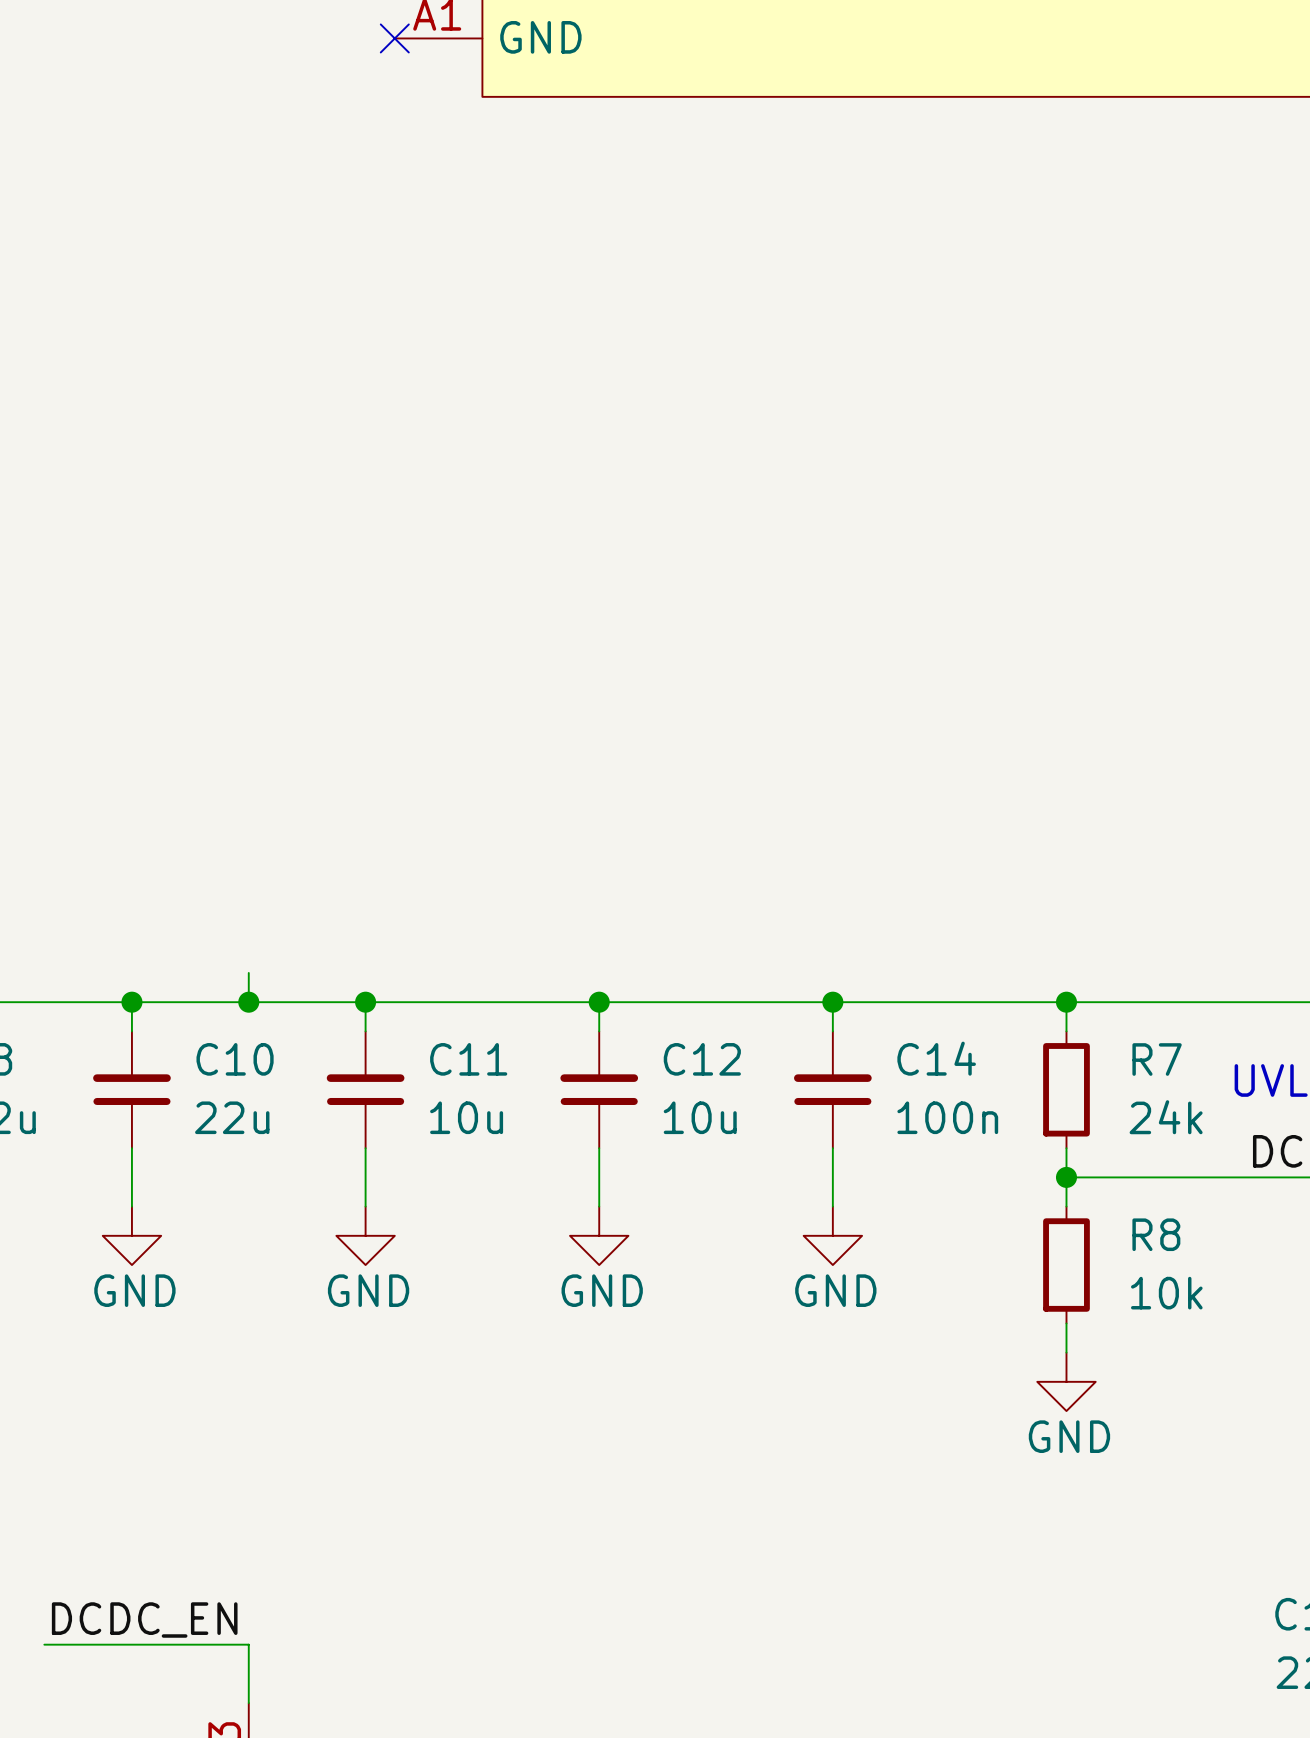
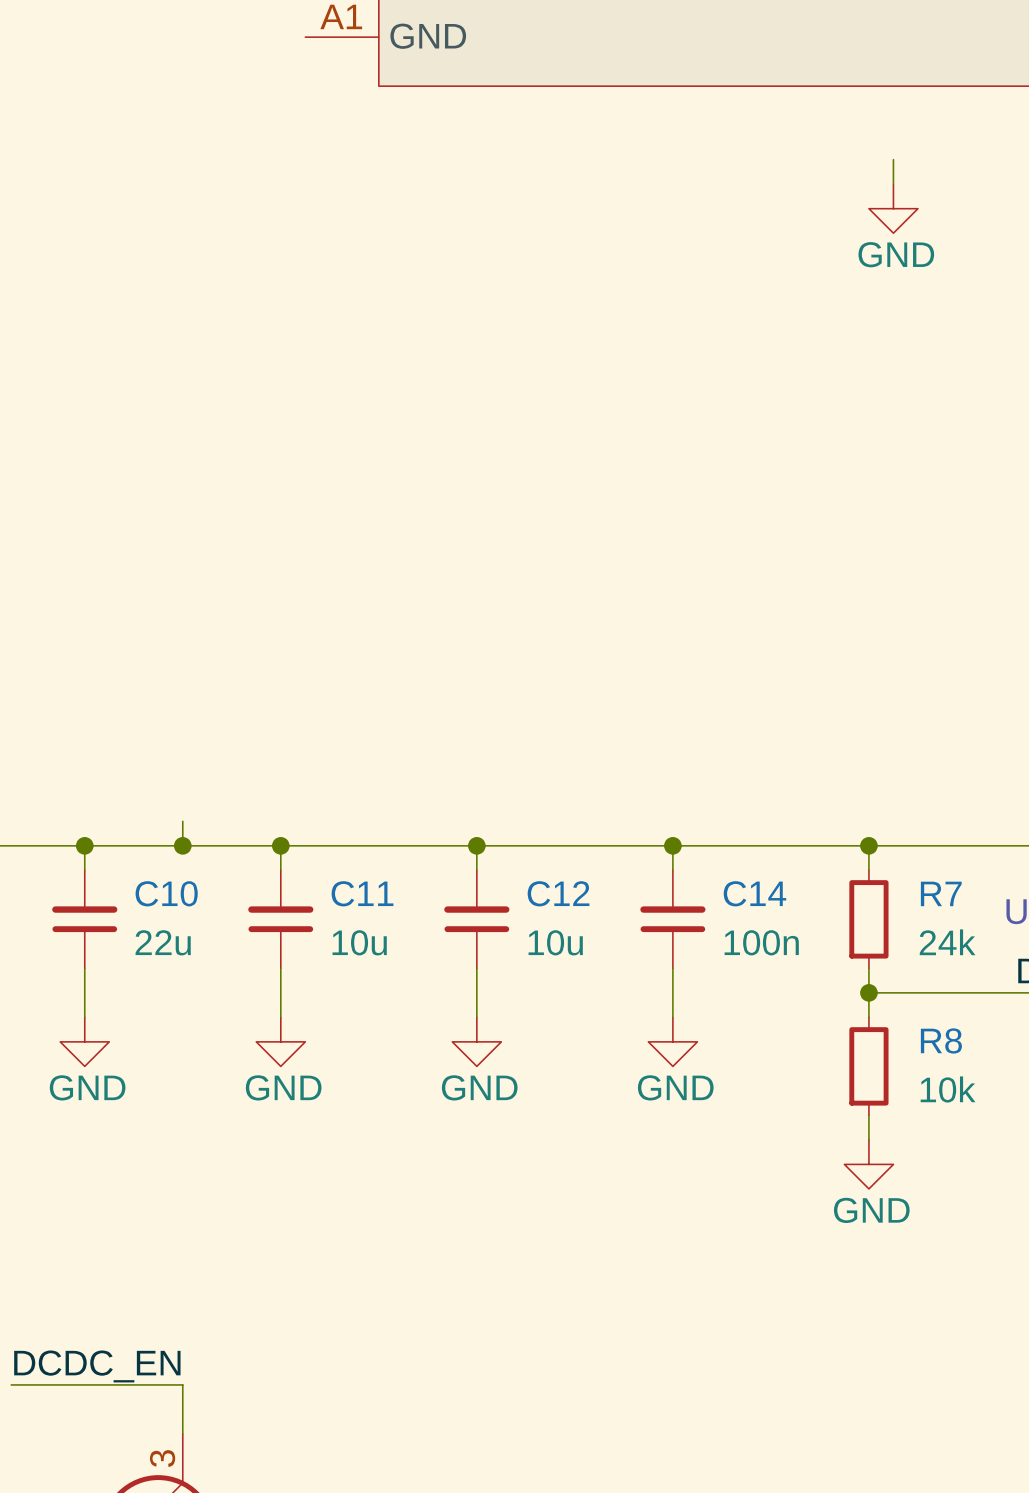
no-connect mark: (394, 38) -> none
wire: none -> (893, 159) (893, 184)
power symbol: none -> GND (893, 208)

